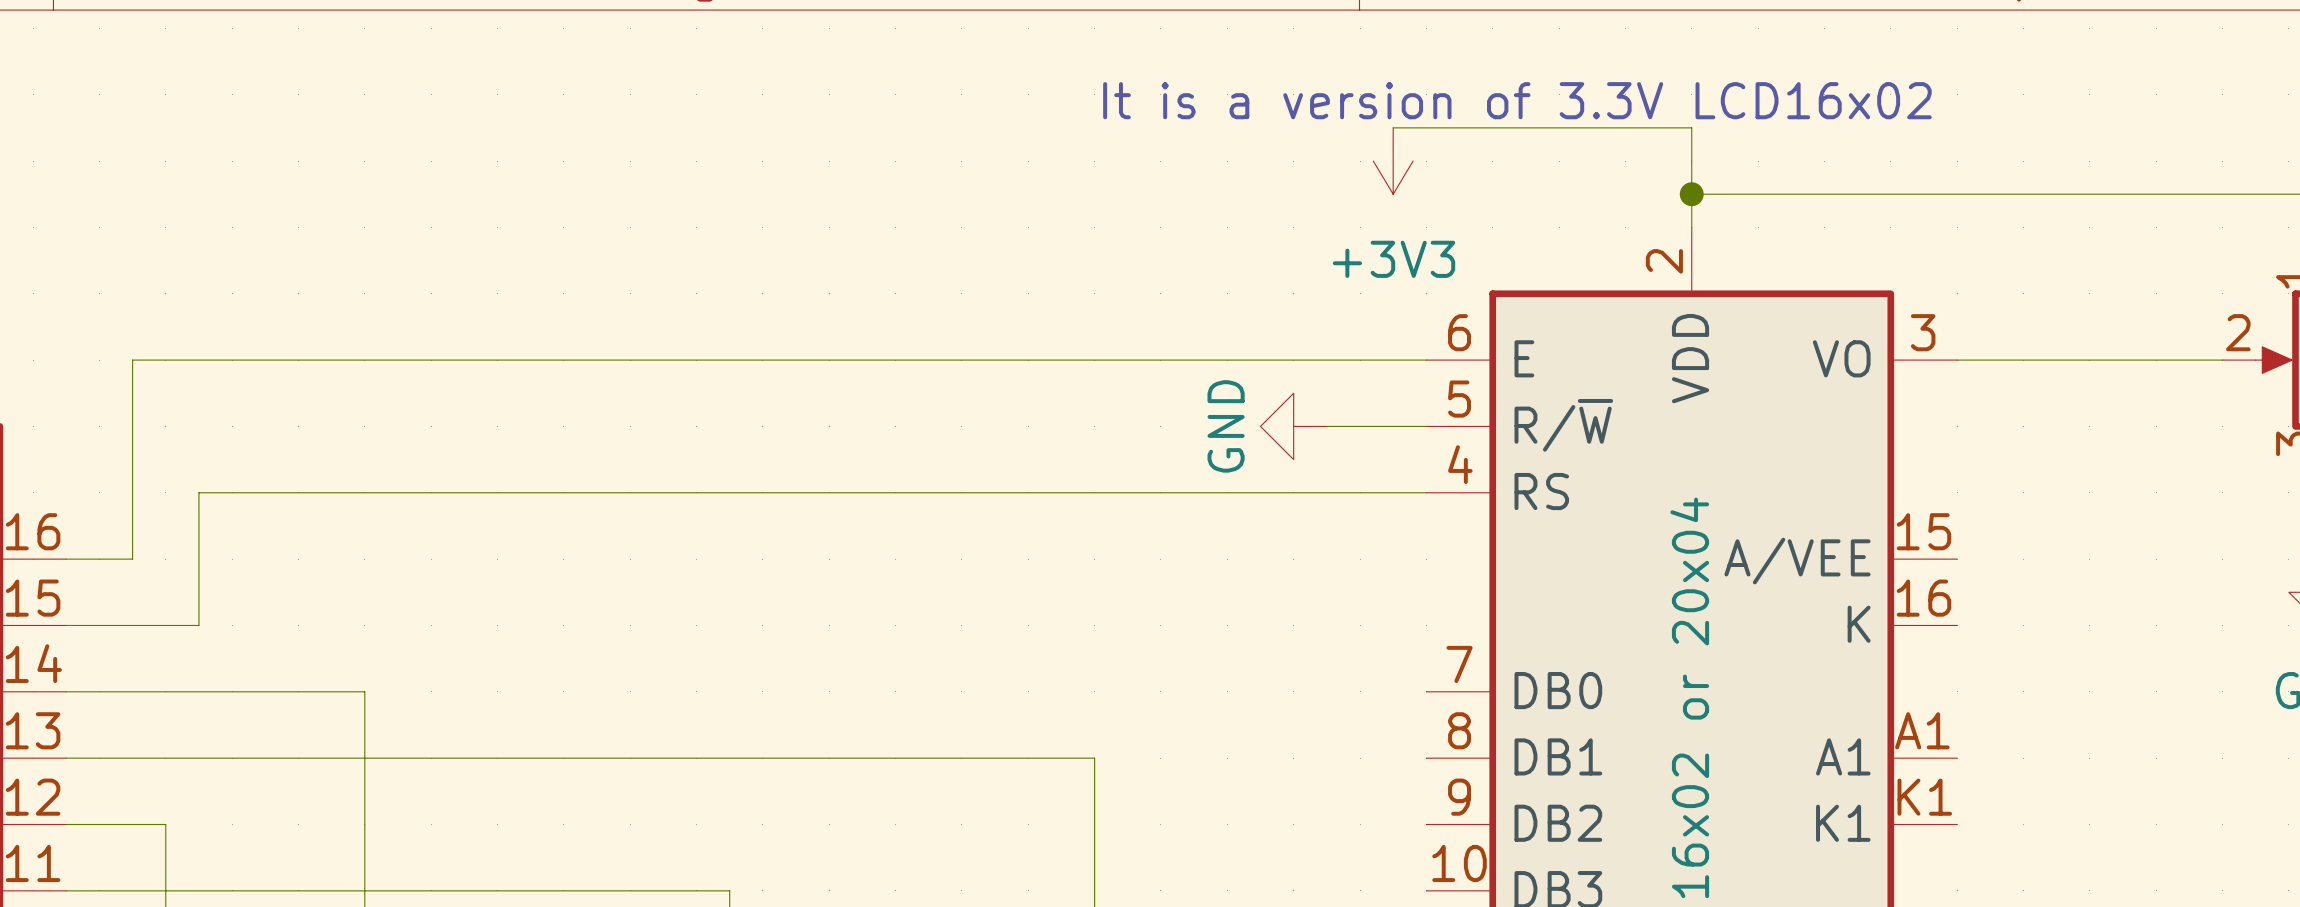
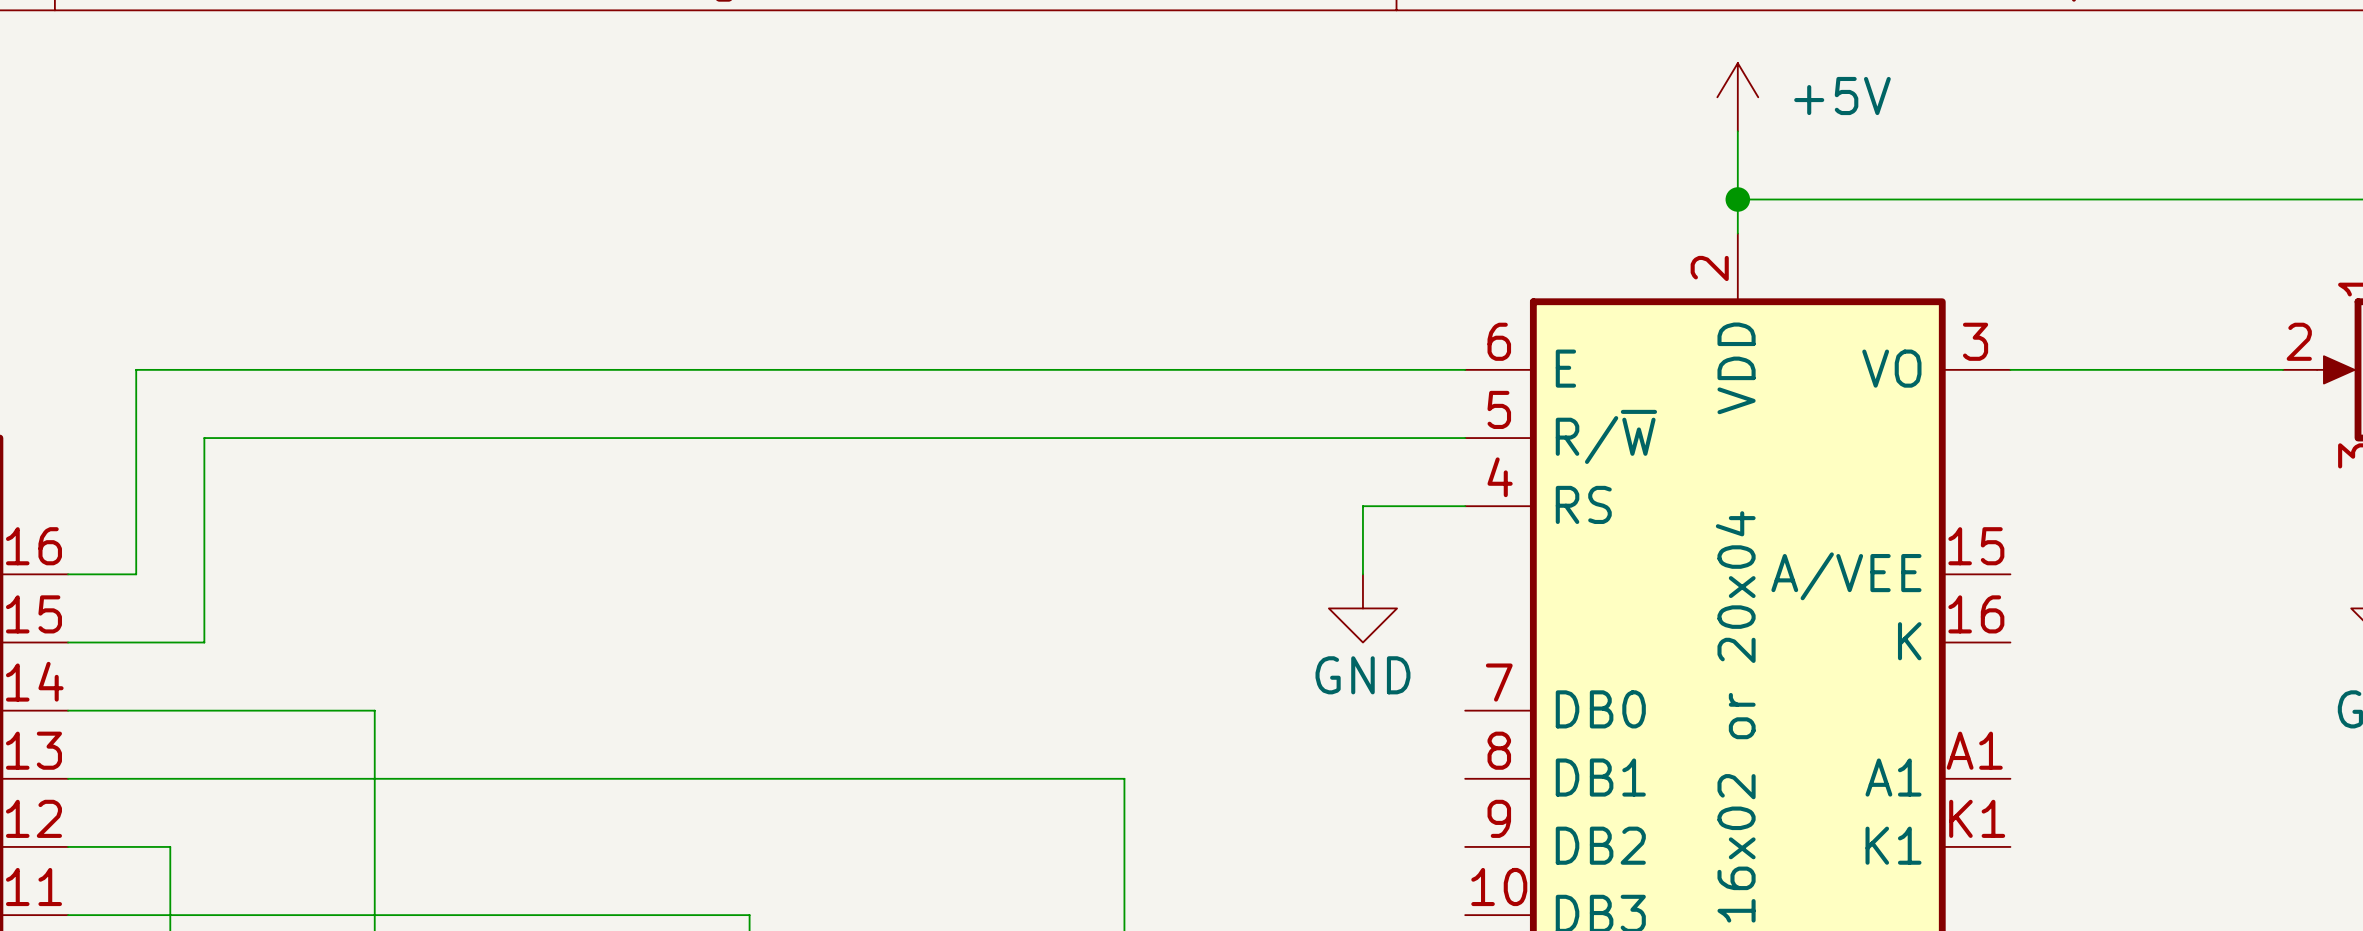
power symbol: none -> +5V (1737, 97)
text: It is a version of 3.3V LCD16x02 (1517, 100) -> none
wire: (1393, 127) (1691, 127) -> none
power symbol: +3V3 (1393, 161) -> none
power symbol rotation: 0° (1293, 426) -> 90° counterclockwise (1362, 608)
power symbol position: GND (1293, 426) -> GND (1362, 608)
wire: (198, 492) (1326, 492) -> (204, 506) (204, 438) (1362, 438)
wire: none -> (1362, 506) (1362, 574)

